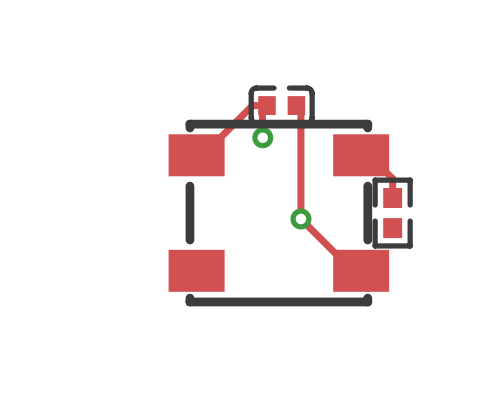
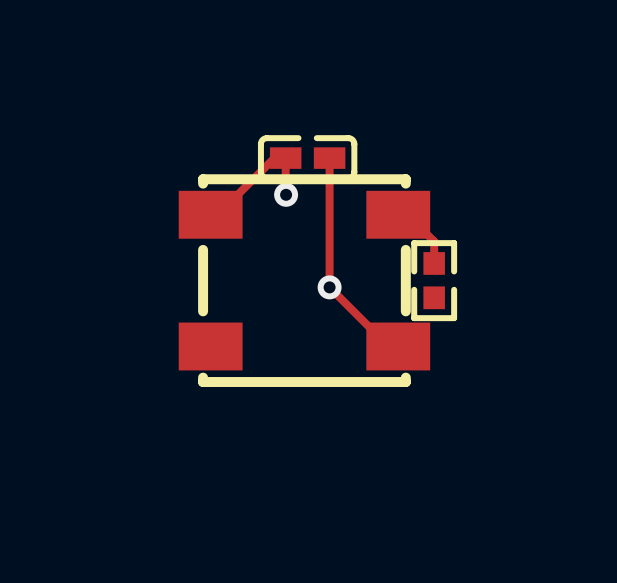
part footprint: [248, 85, 315, 126] -> [257, 135, 358, 182]

